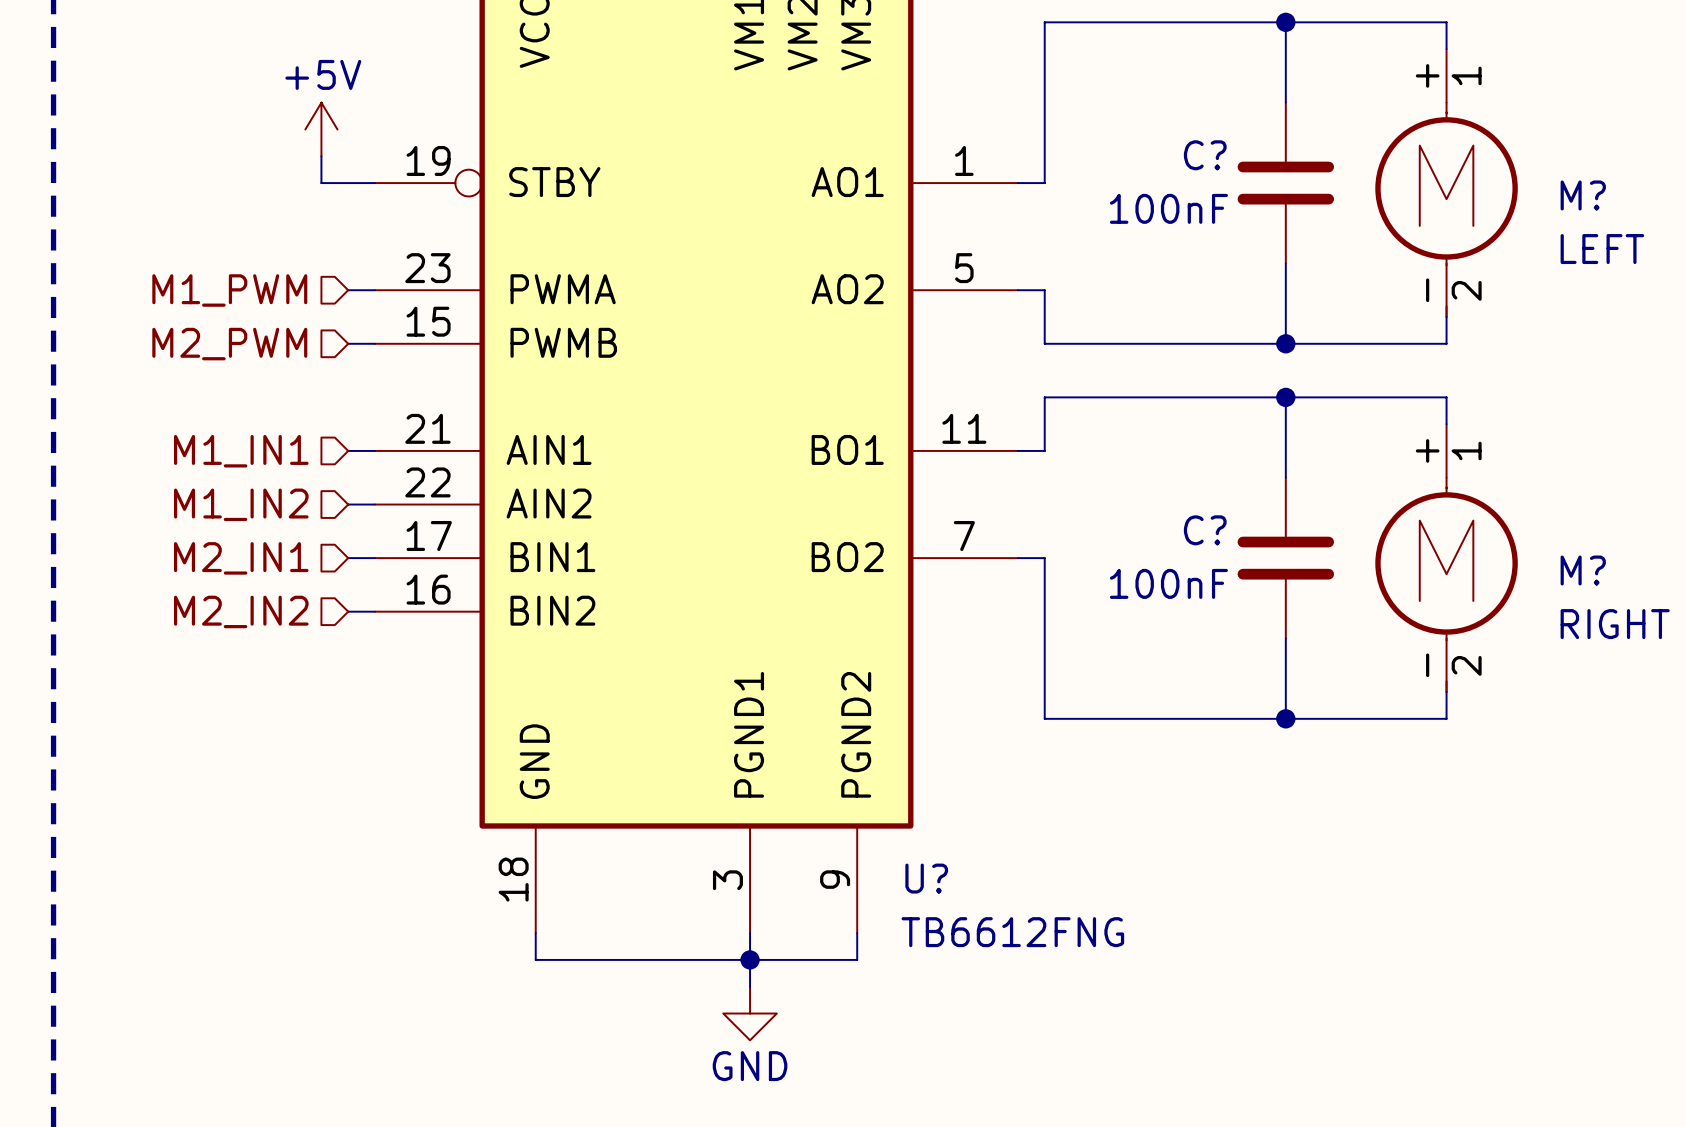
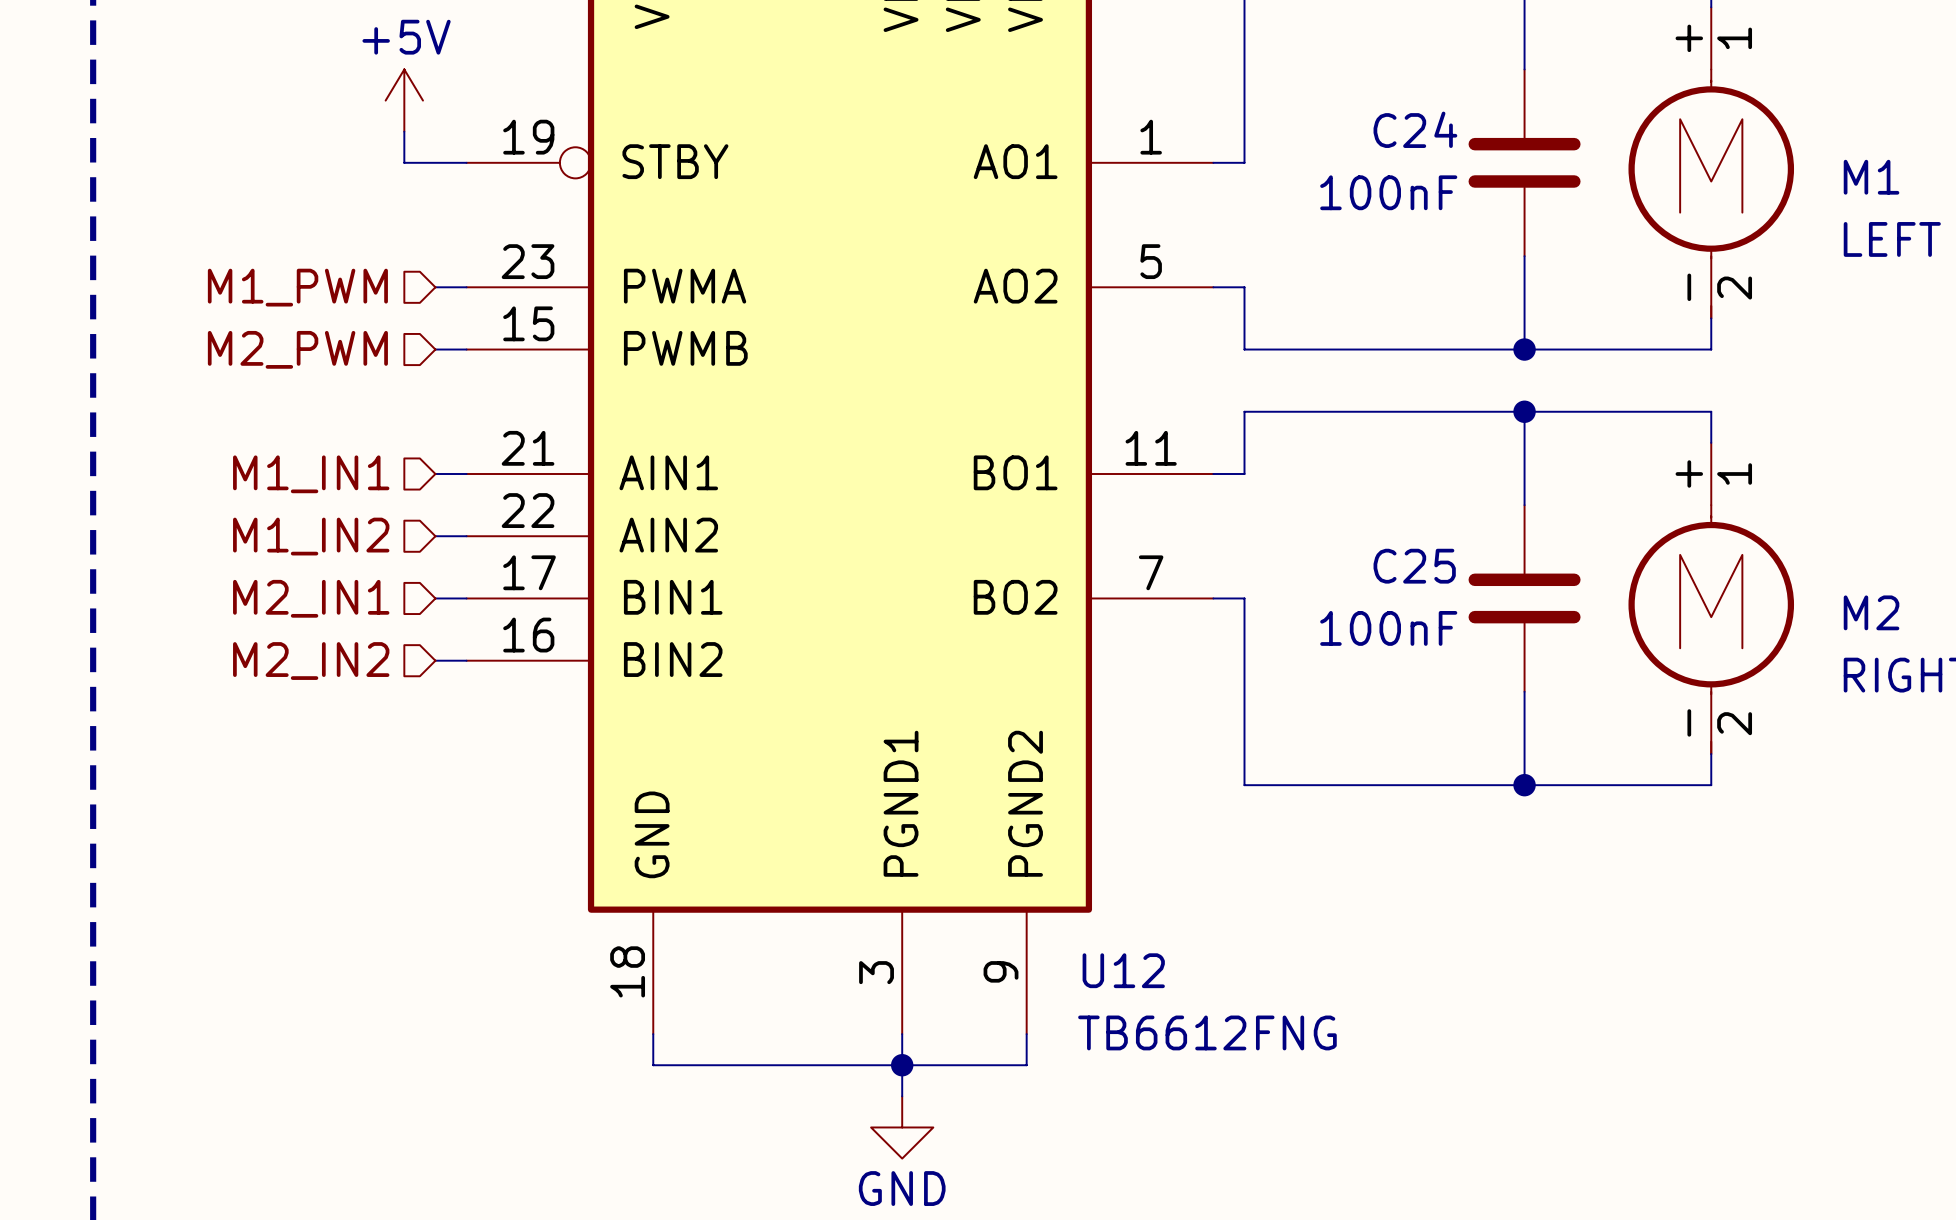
C? name: C? (1205, 155) -> C24 (1415, 129)
M? name: M? (1583, 195) -> M1 (1871, 177)
C? name: C? (1205, 530) -> C25 (1414, 566)
M? name: M? (1583, 570) -> M2 (1871, 612)
U? name: U? (926, 878) -> U12 (1123, 970)

